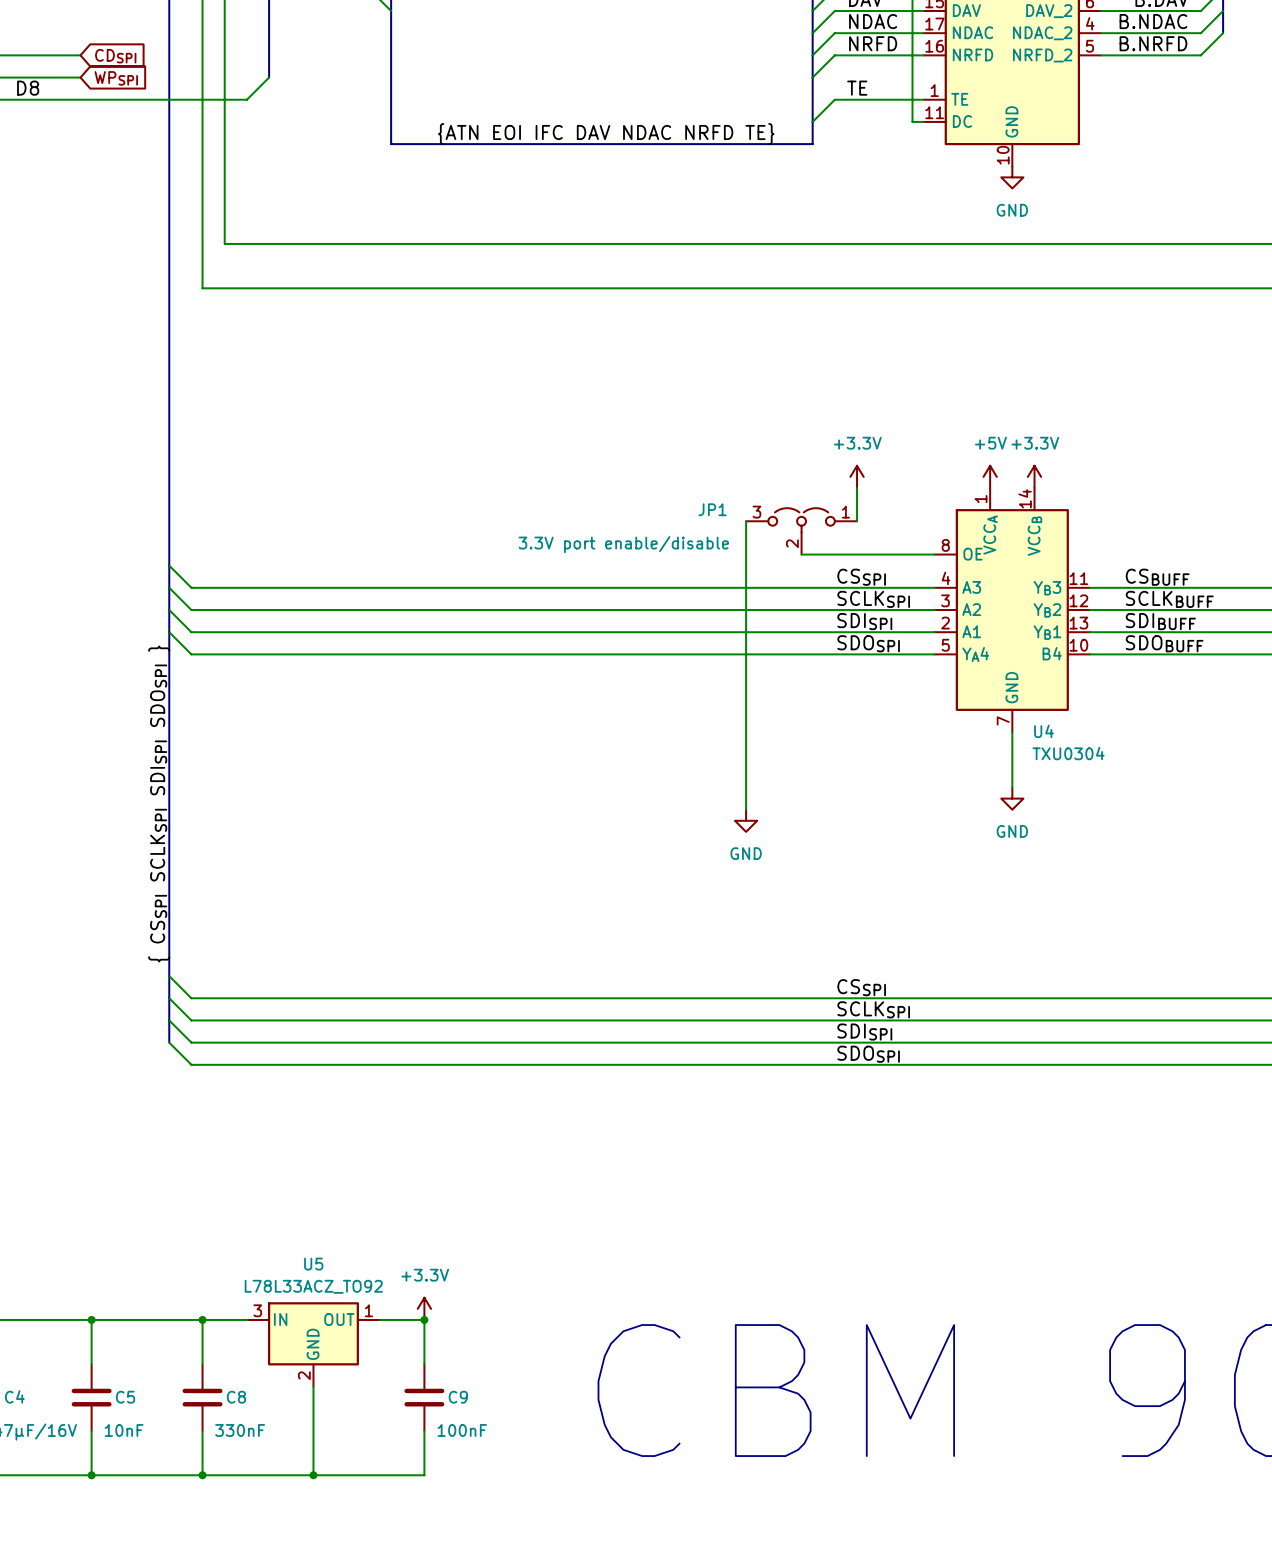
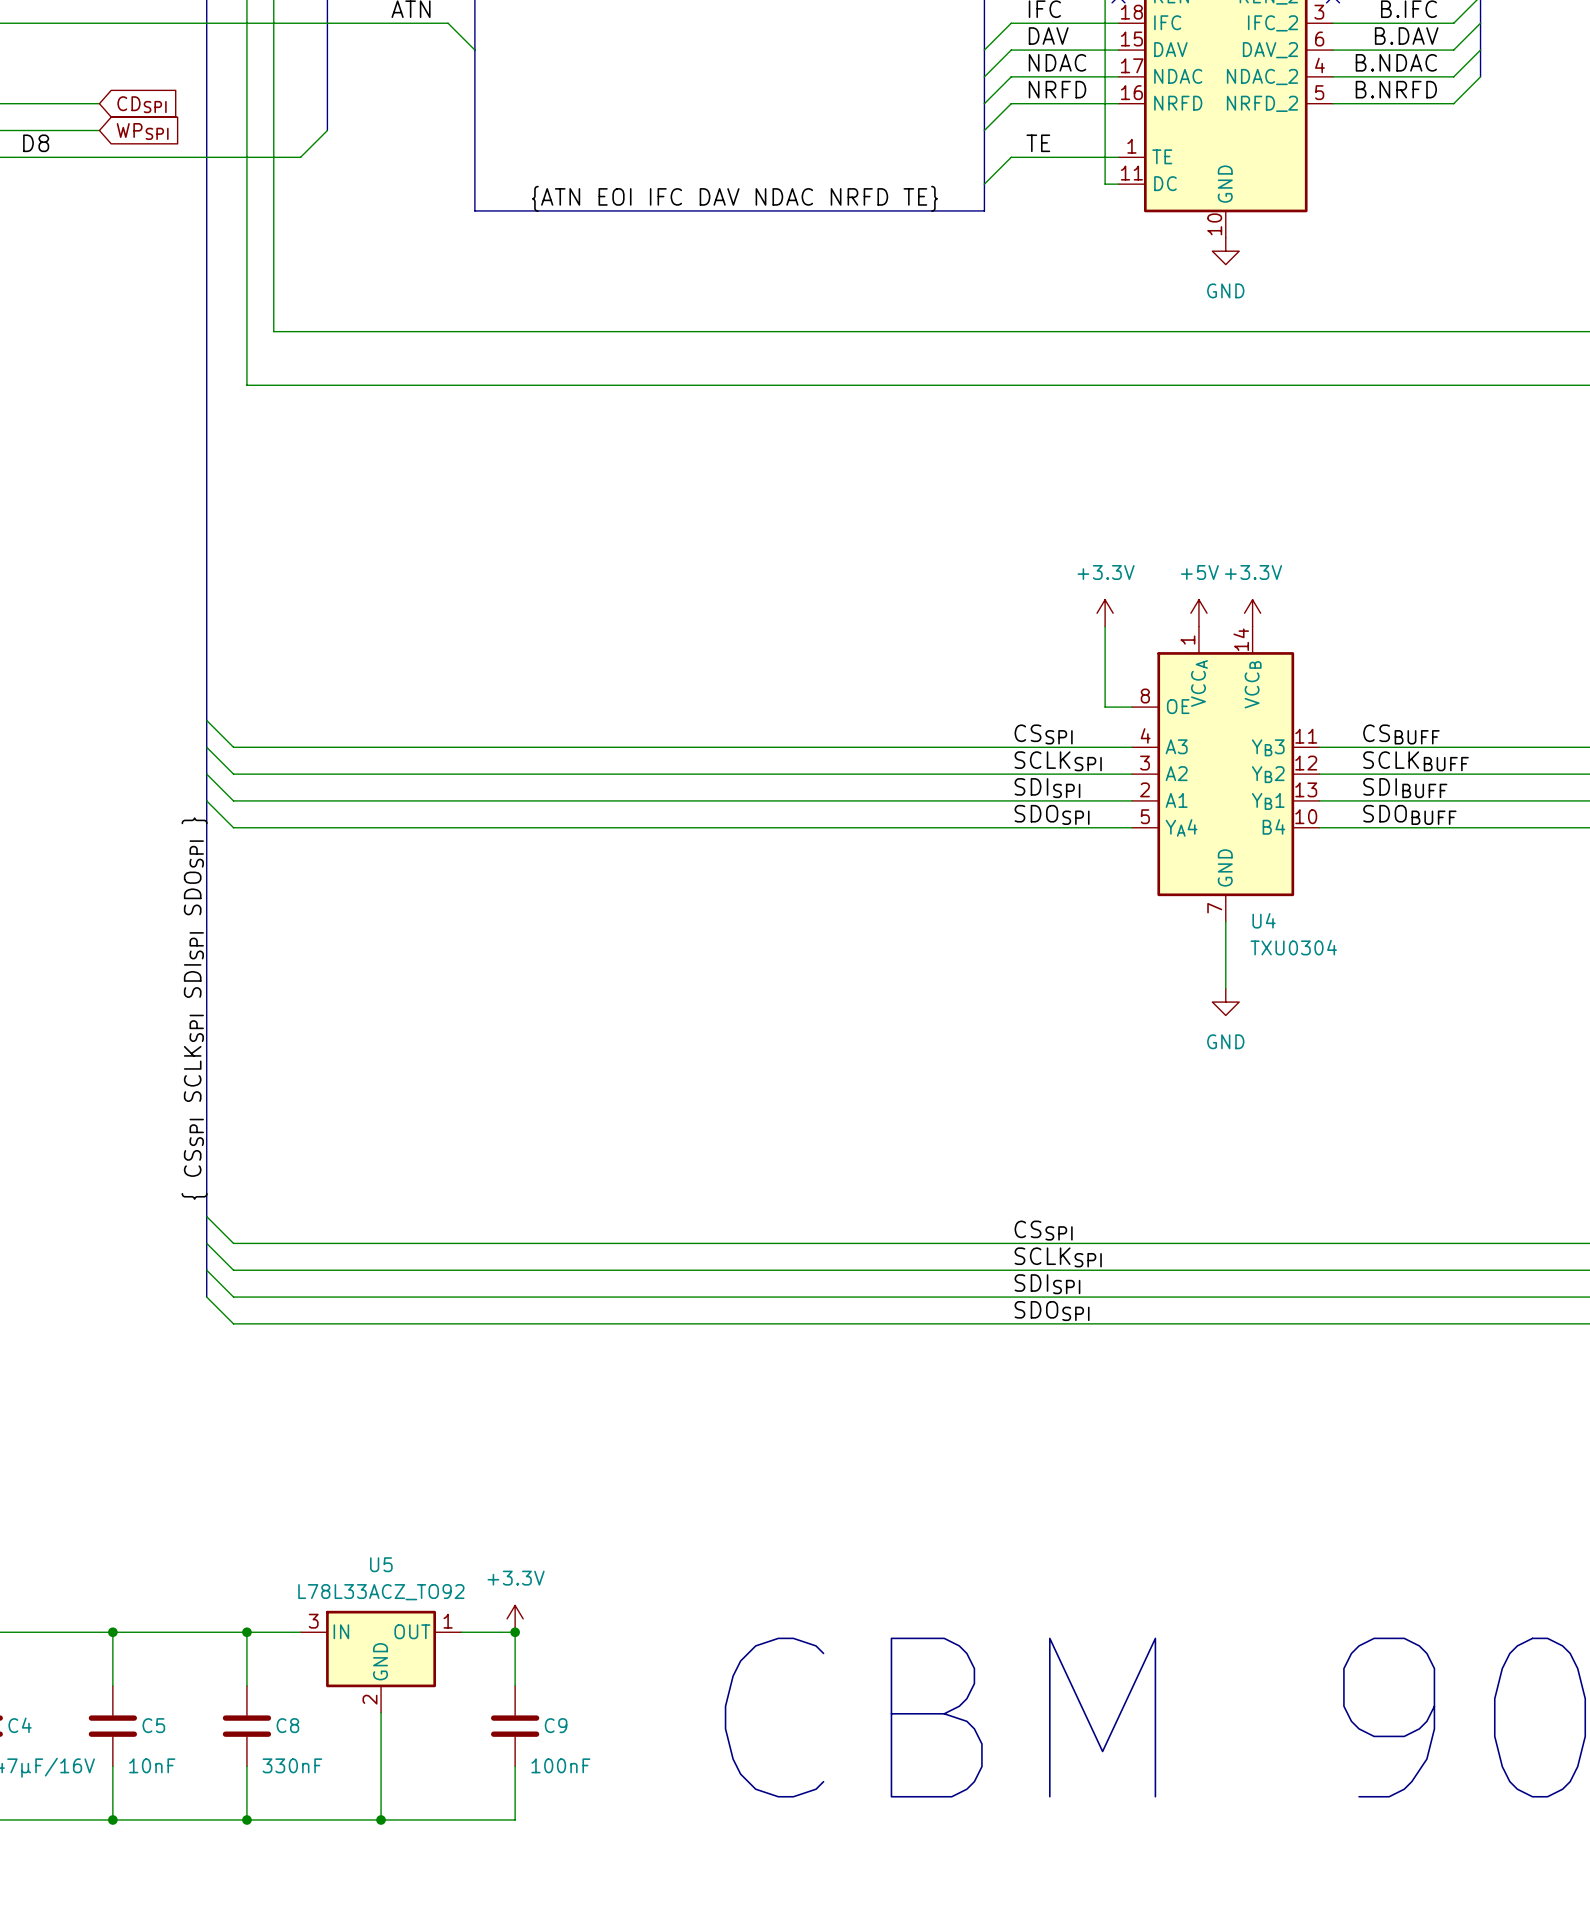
power symbol position: +3.3V (857, 476) -> +3.3V (1105, 613)
wire: (857, 487) (857, 521) -> none
wire: (746, 521) (746, 809) -> none
JP1: 3.3V port enable/disable (801, 531) -> none
wire: (801, 554) (912, 554) -> (1105, 626) (1105, 707)
power symbol: GND (746, 820) -> none

